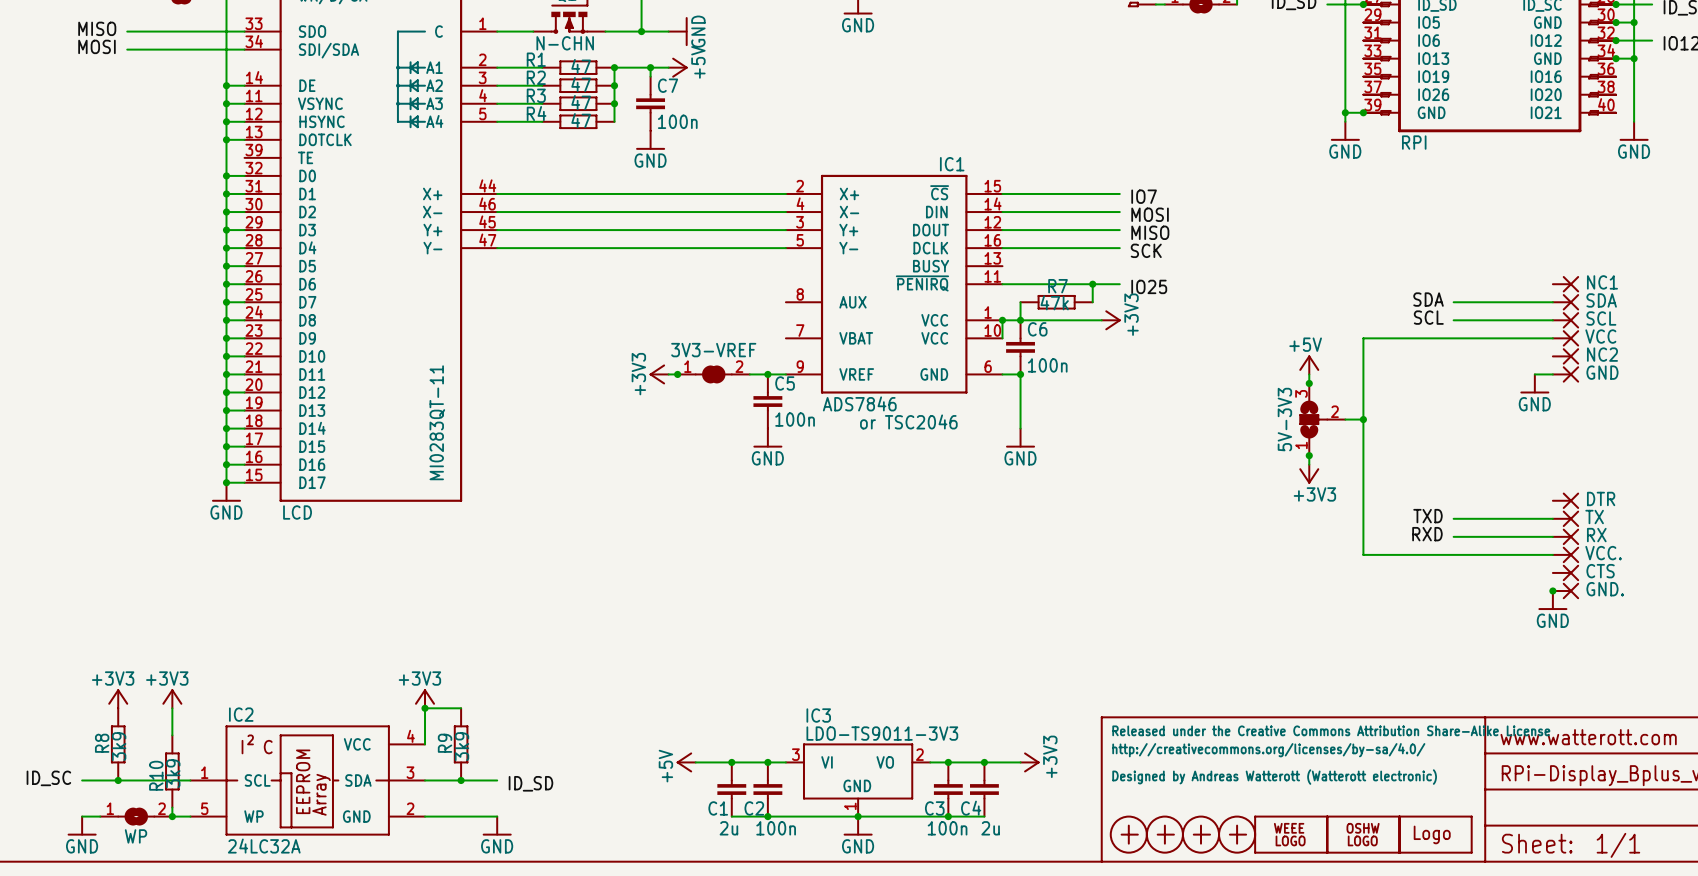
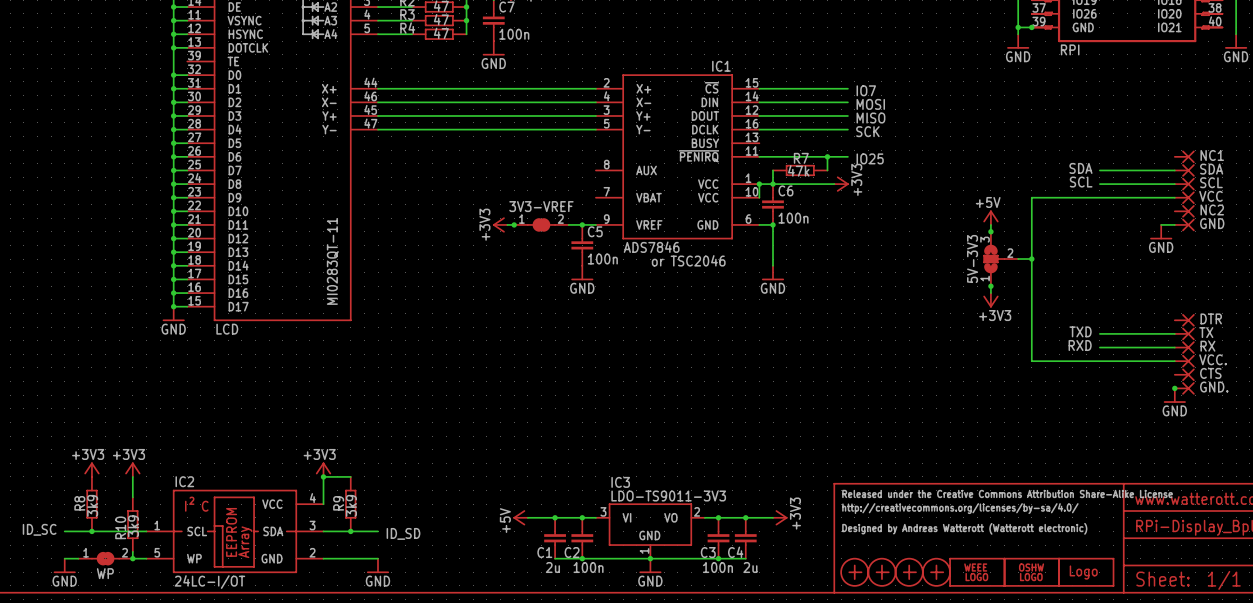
IC2 value: 24LC32A (264, 846) -> 24LC-I/OT (209, 582)

